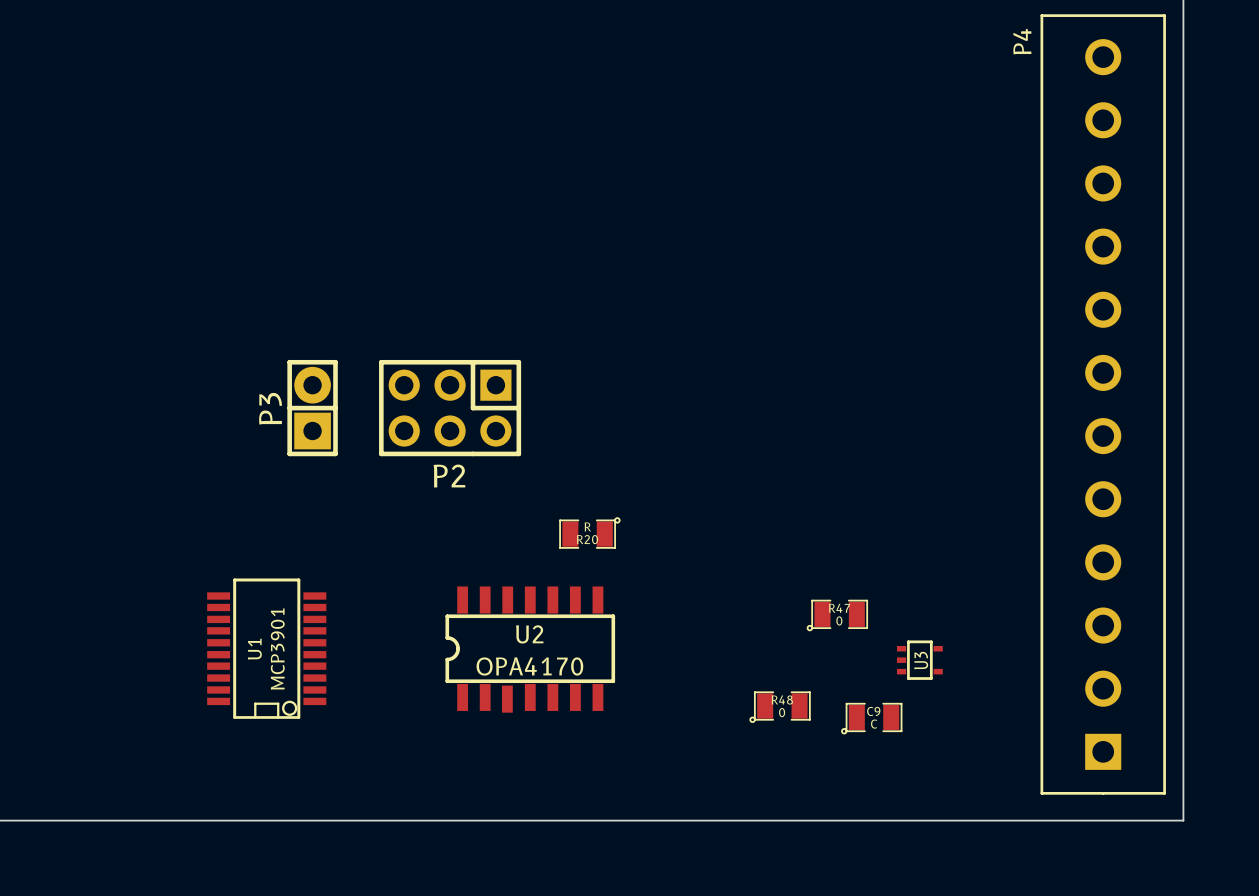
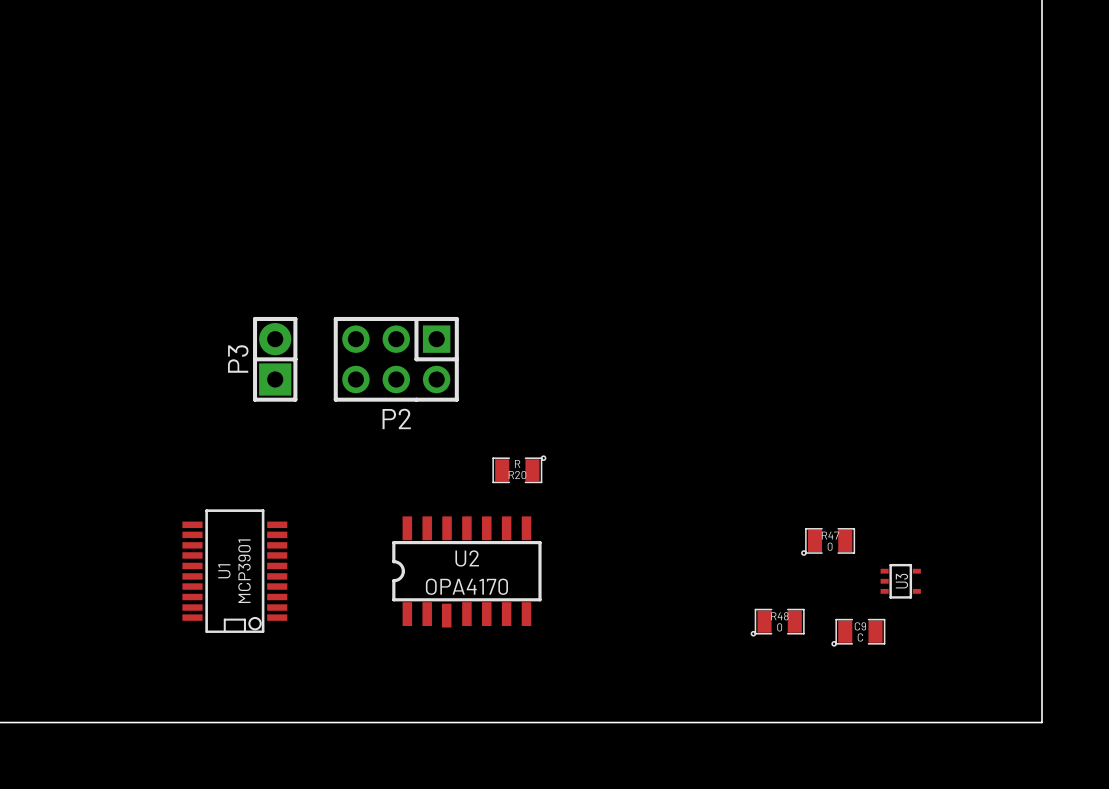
P4: (1103, 404) -> none
R47 position: (837, 615) -> (828, 541)
U3 position: (919, 660) -> (900, 581)
R48 position: (780, 707) -> (777, 622)
C9 position: (871, 718) -> (858, 632)

